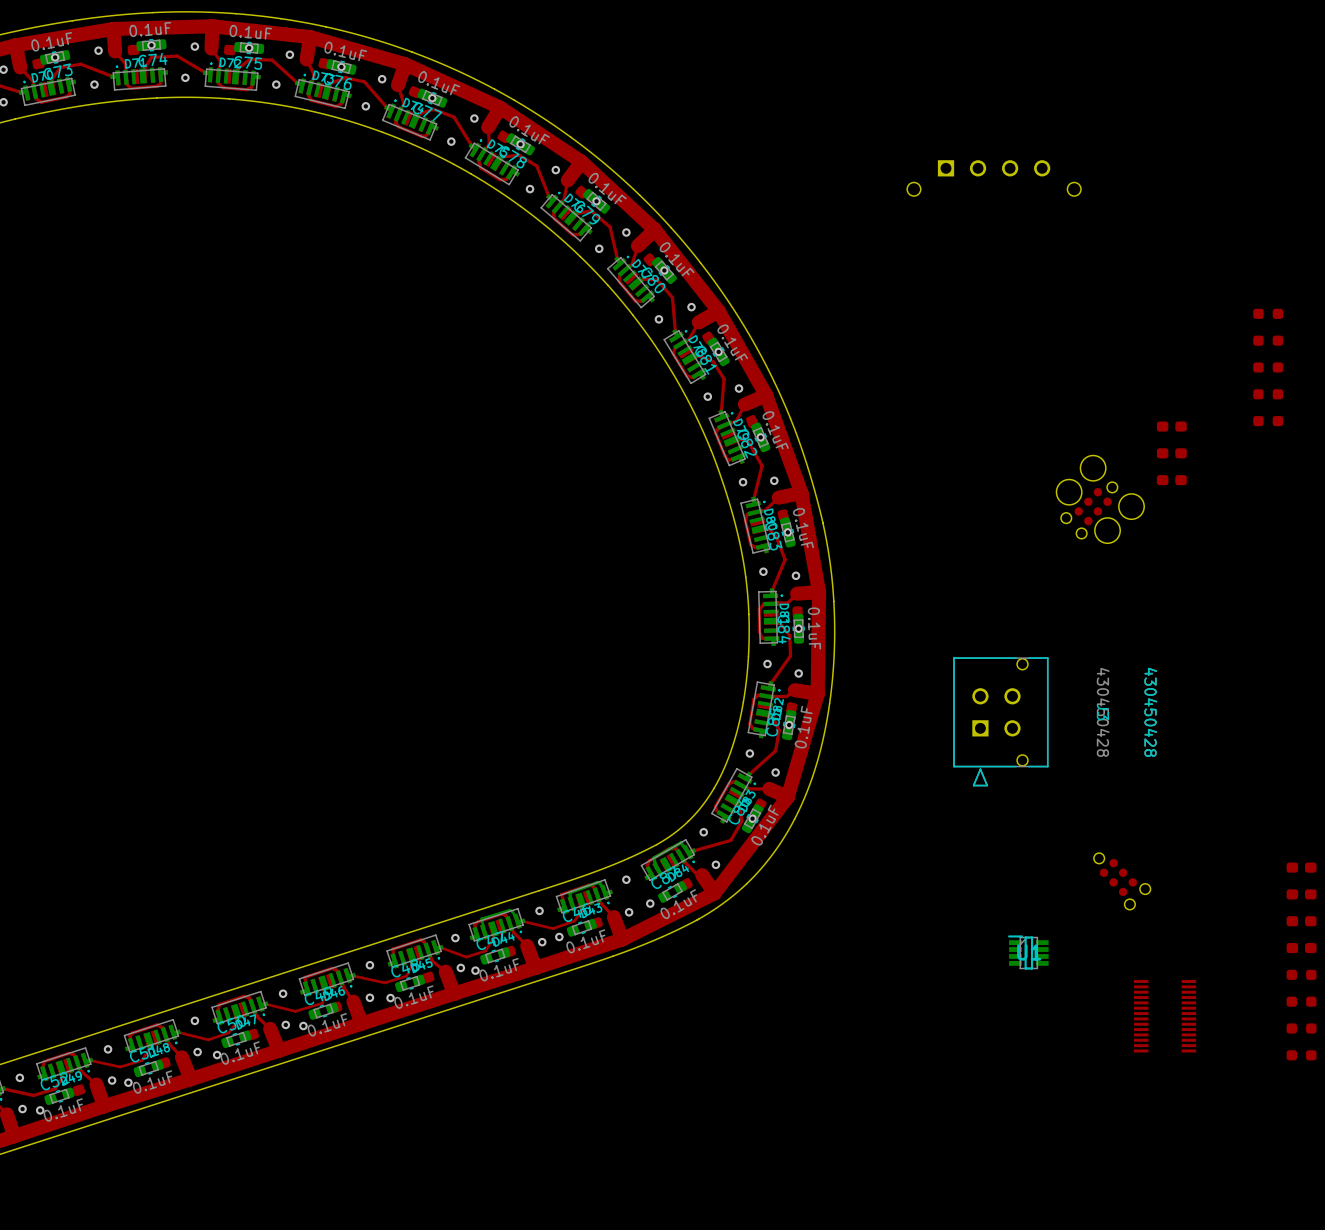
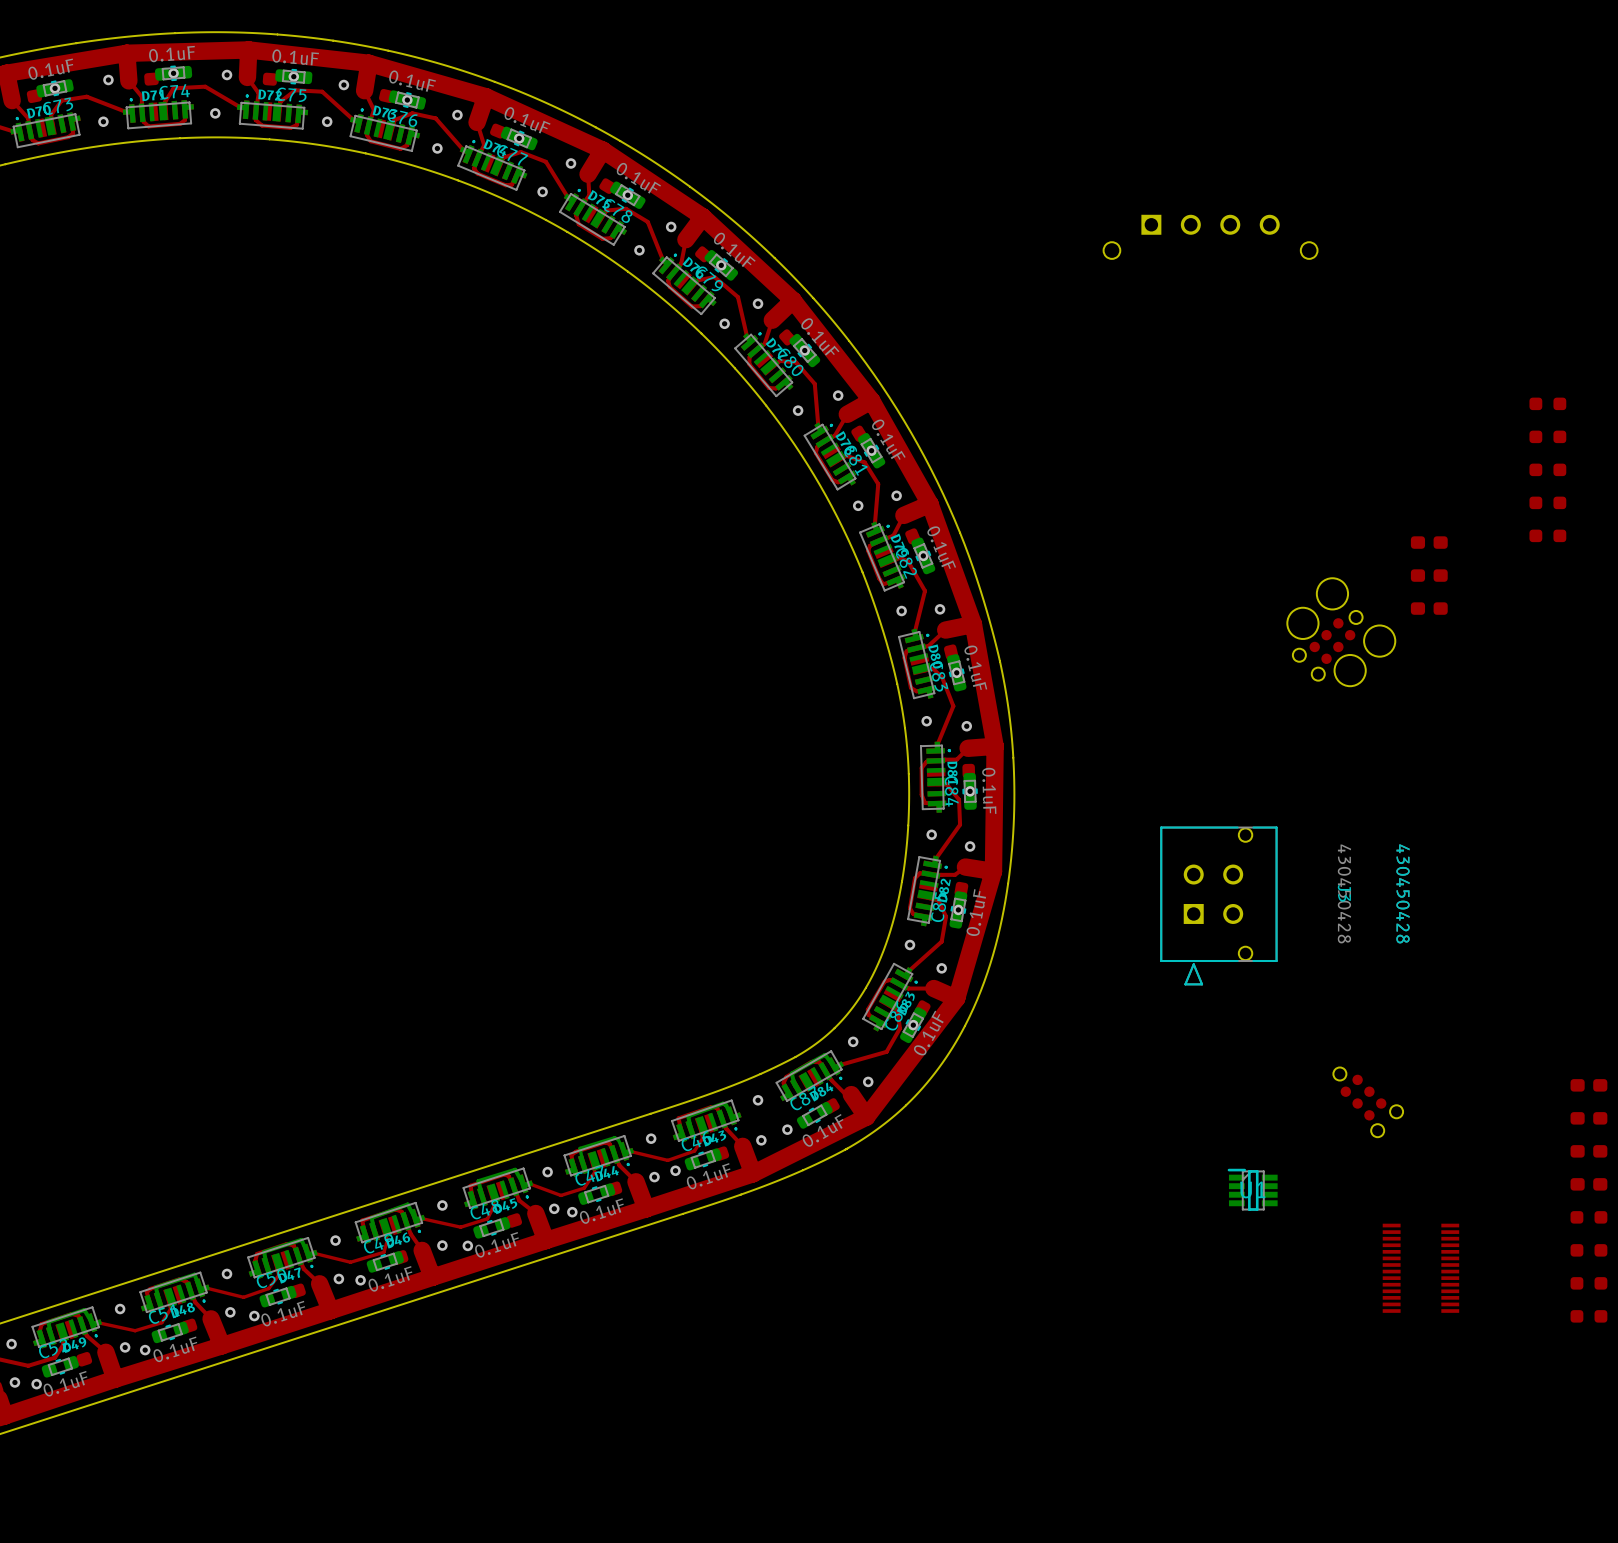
bottom track: none -> (523, 1183) (515, 1169) (478, 1181) (482, 1197)
bottom track: none -> (415, 1218) (407, 1204) (371, 1217) (374, 1231)
bottom track: none -> (307, 1253) (301, 1239) (264, 1251) (266, 1266)
bottom track: none -> (199, 1287) (194, 1274) (155, 1287) (159, 1301)
bottom track: none -> (91, 1322) (84, 1310) (48, 1322) (51, 1335)

